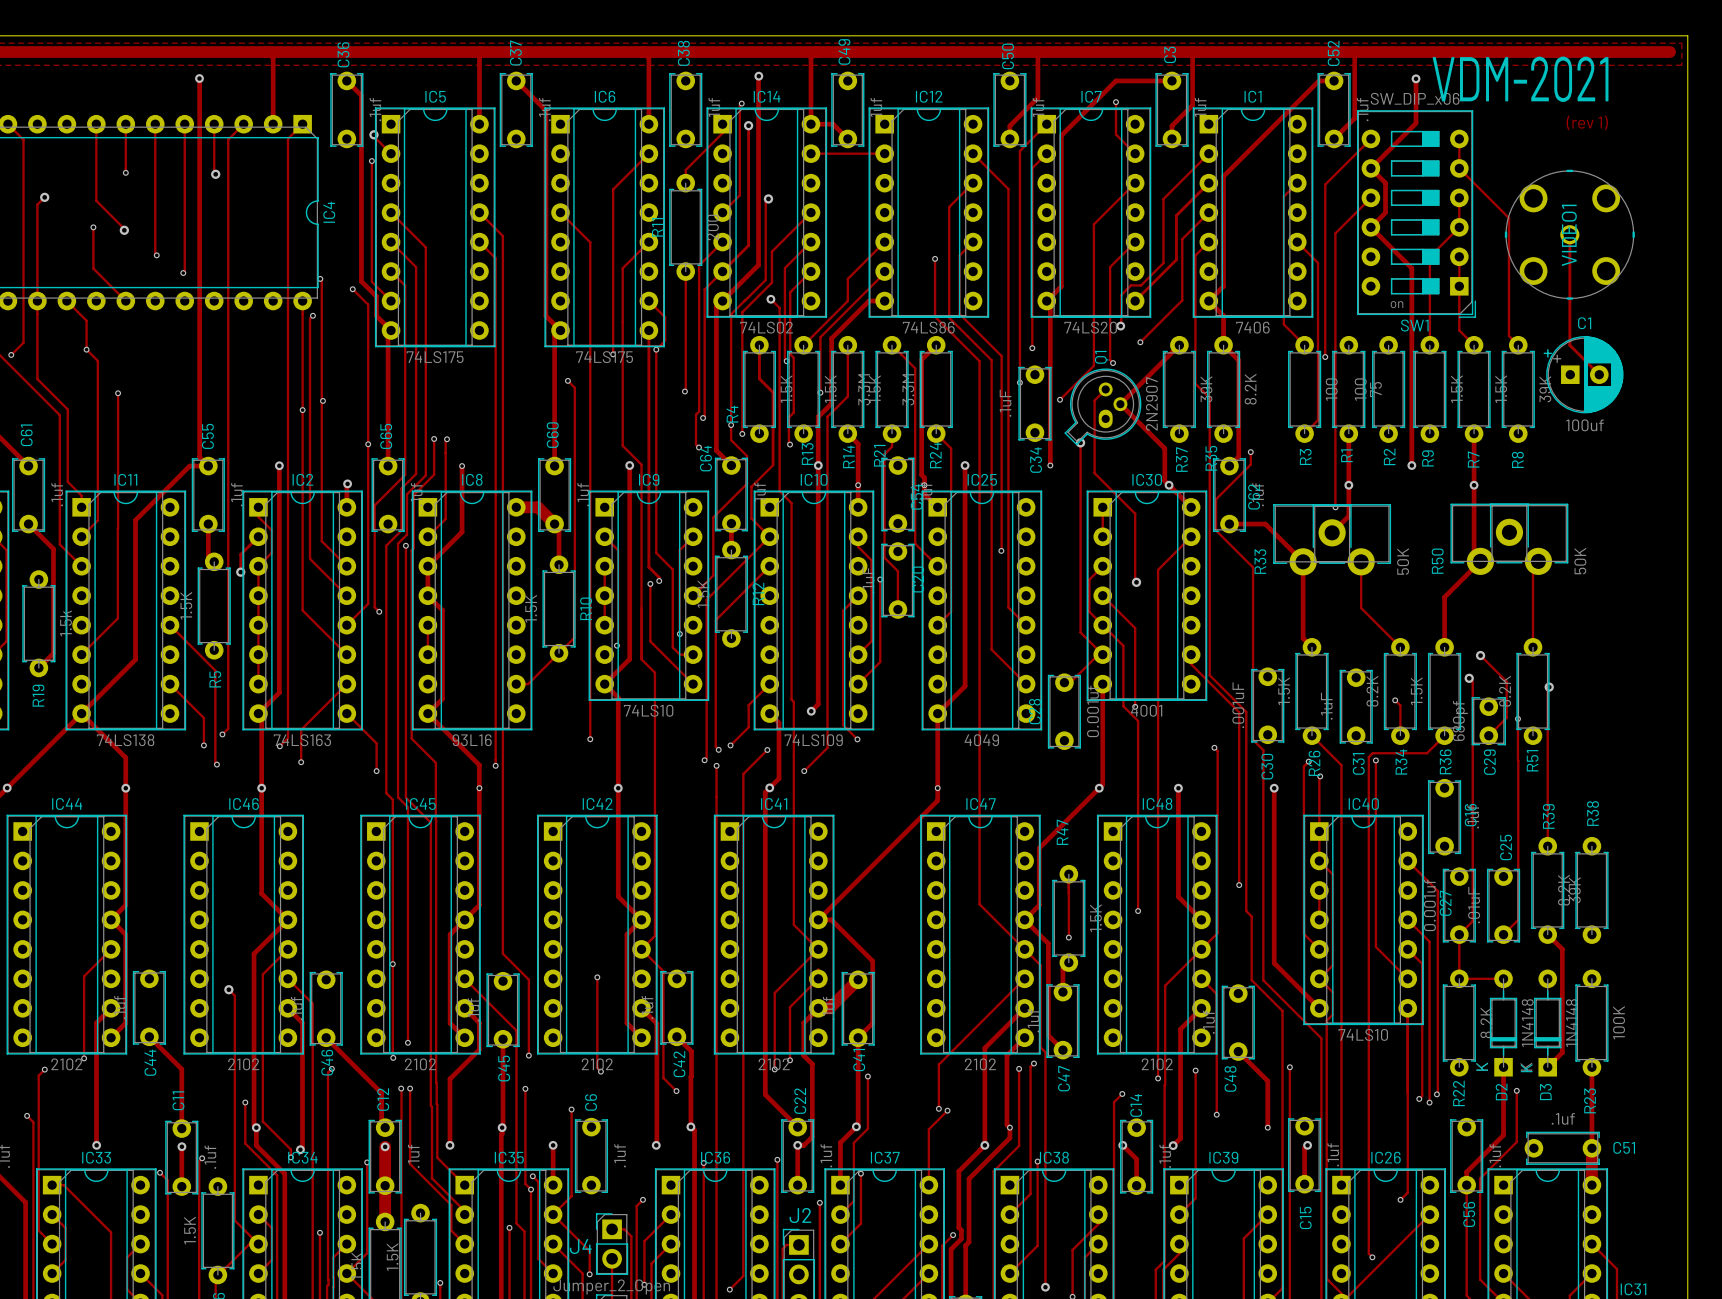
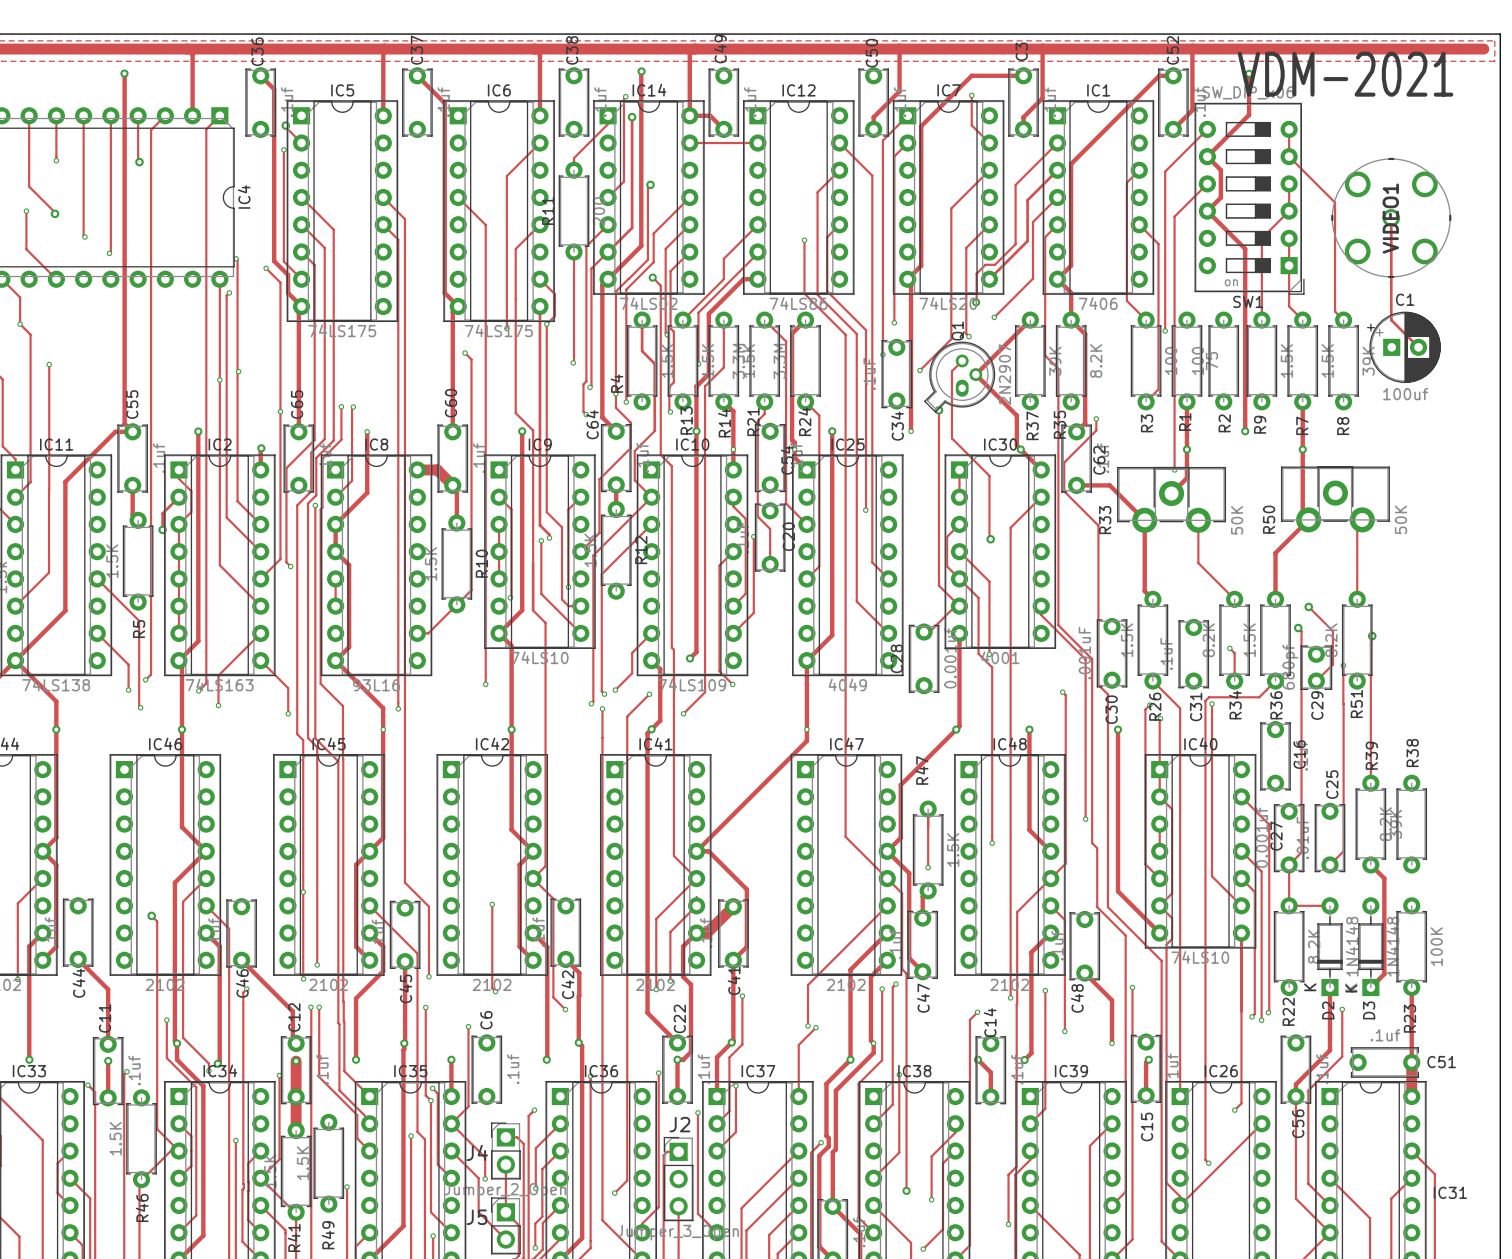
text: (rev 1) (1587, 122) -> none

